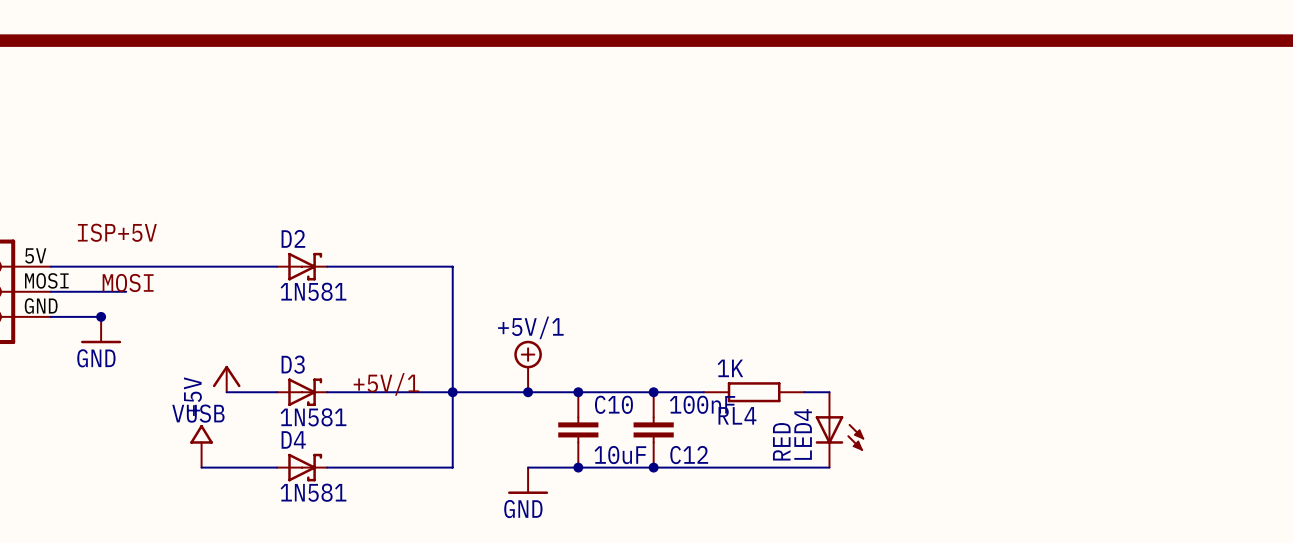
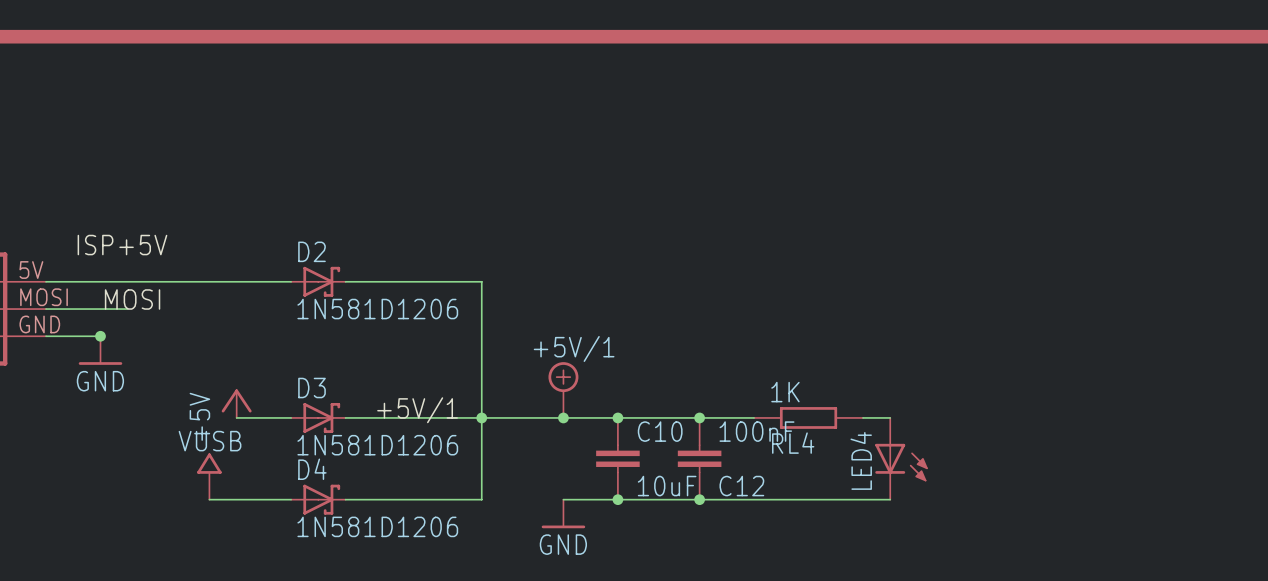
D2 value: 1N581 (313, 291) -> 1N581D1206 (377, 309)
D3 value: 1N581 (313, 417) -> 1N581D1206 (377, 445)
LED4 value: RED (781, 441) -> none
D4 value: 1N581 (313, 492) -> 1N581D1206 (377, 526)

